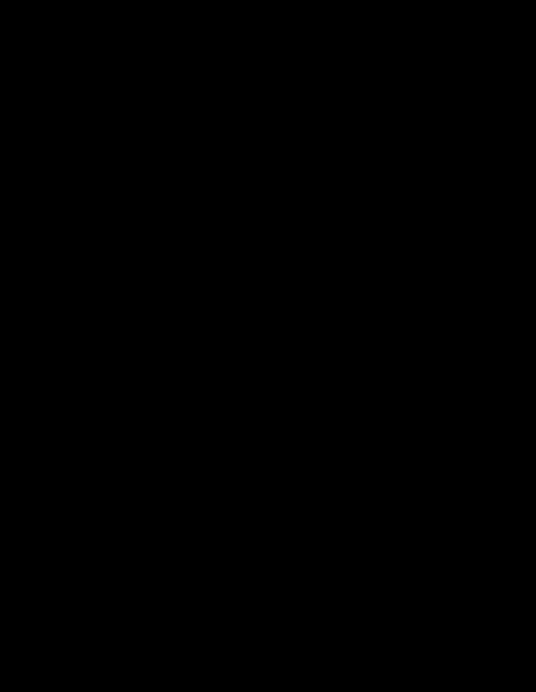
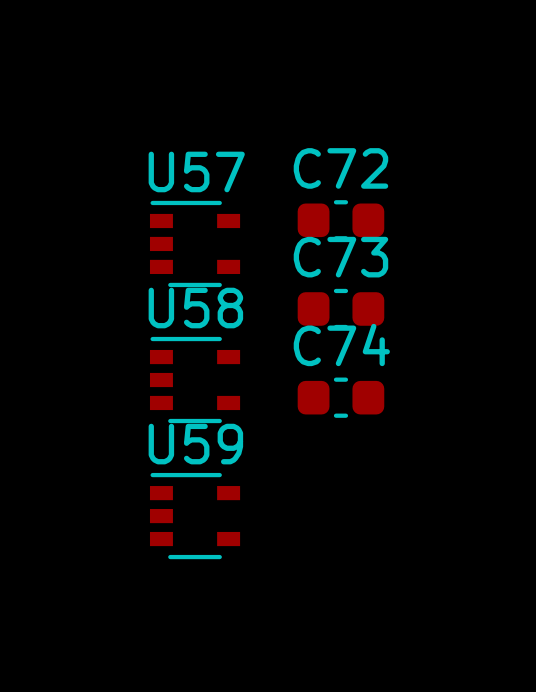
C72: none -> (340, 220)
U57: none -> (195, 243)
C73: none -> (340, 308)
U58: none -> (195, 380)
C74: none -> (340, 397)
U59: none -> (195, 516)

